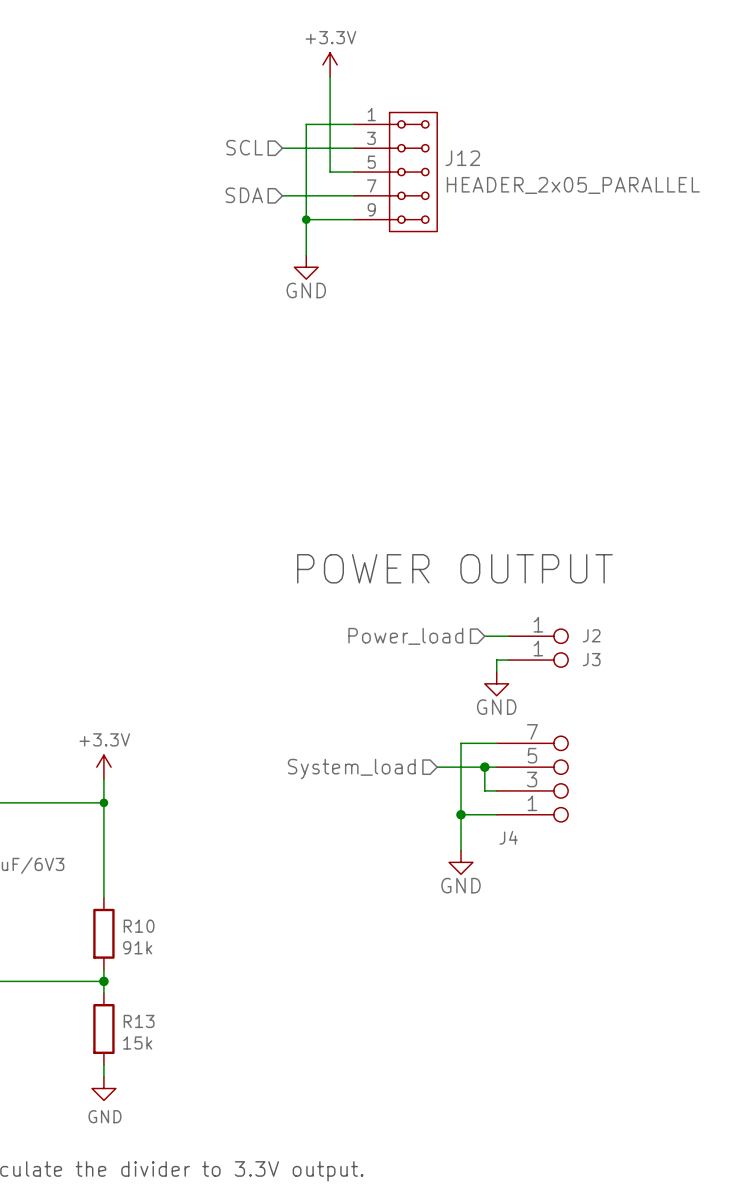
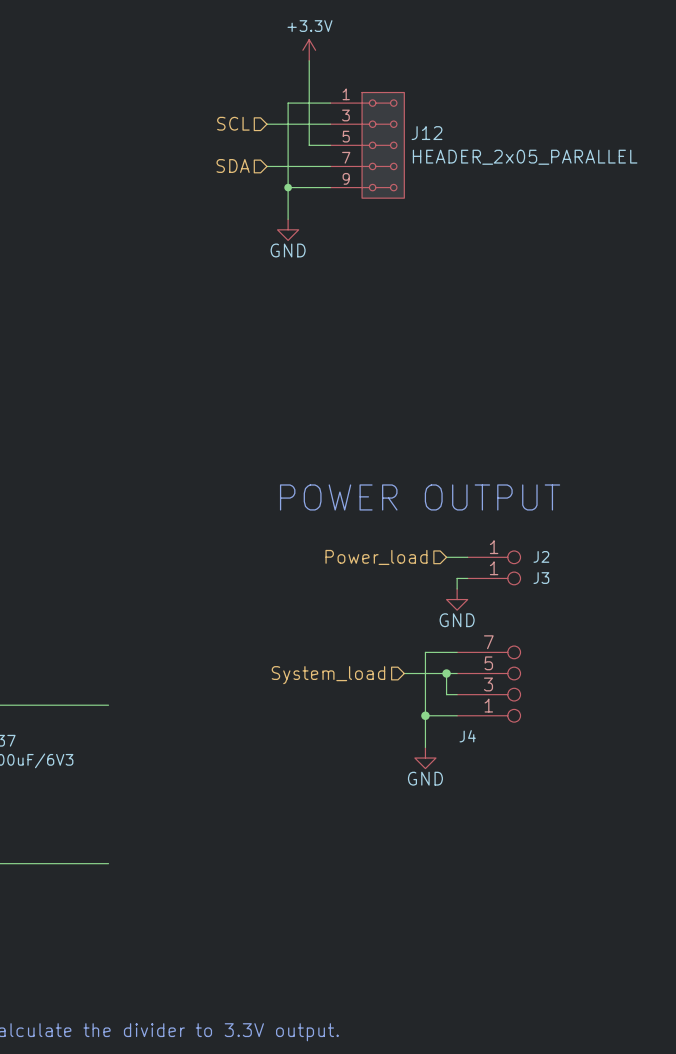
power symbol: +3.3V (103, 767) -> none
wire: (103, 779) (103, 898) -> none
junction: (103, 802) -> none
R10: 91k (103, 933) -> none
wire: (103, 969) (103, 993) -> none
junction: (103, 981) -> none
R13: 15k (103, 1029) -> none
wire: (103, 1064) (103, 1076) -> none
power symbol: GND (103, 1088) -> none

